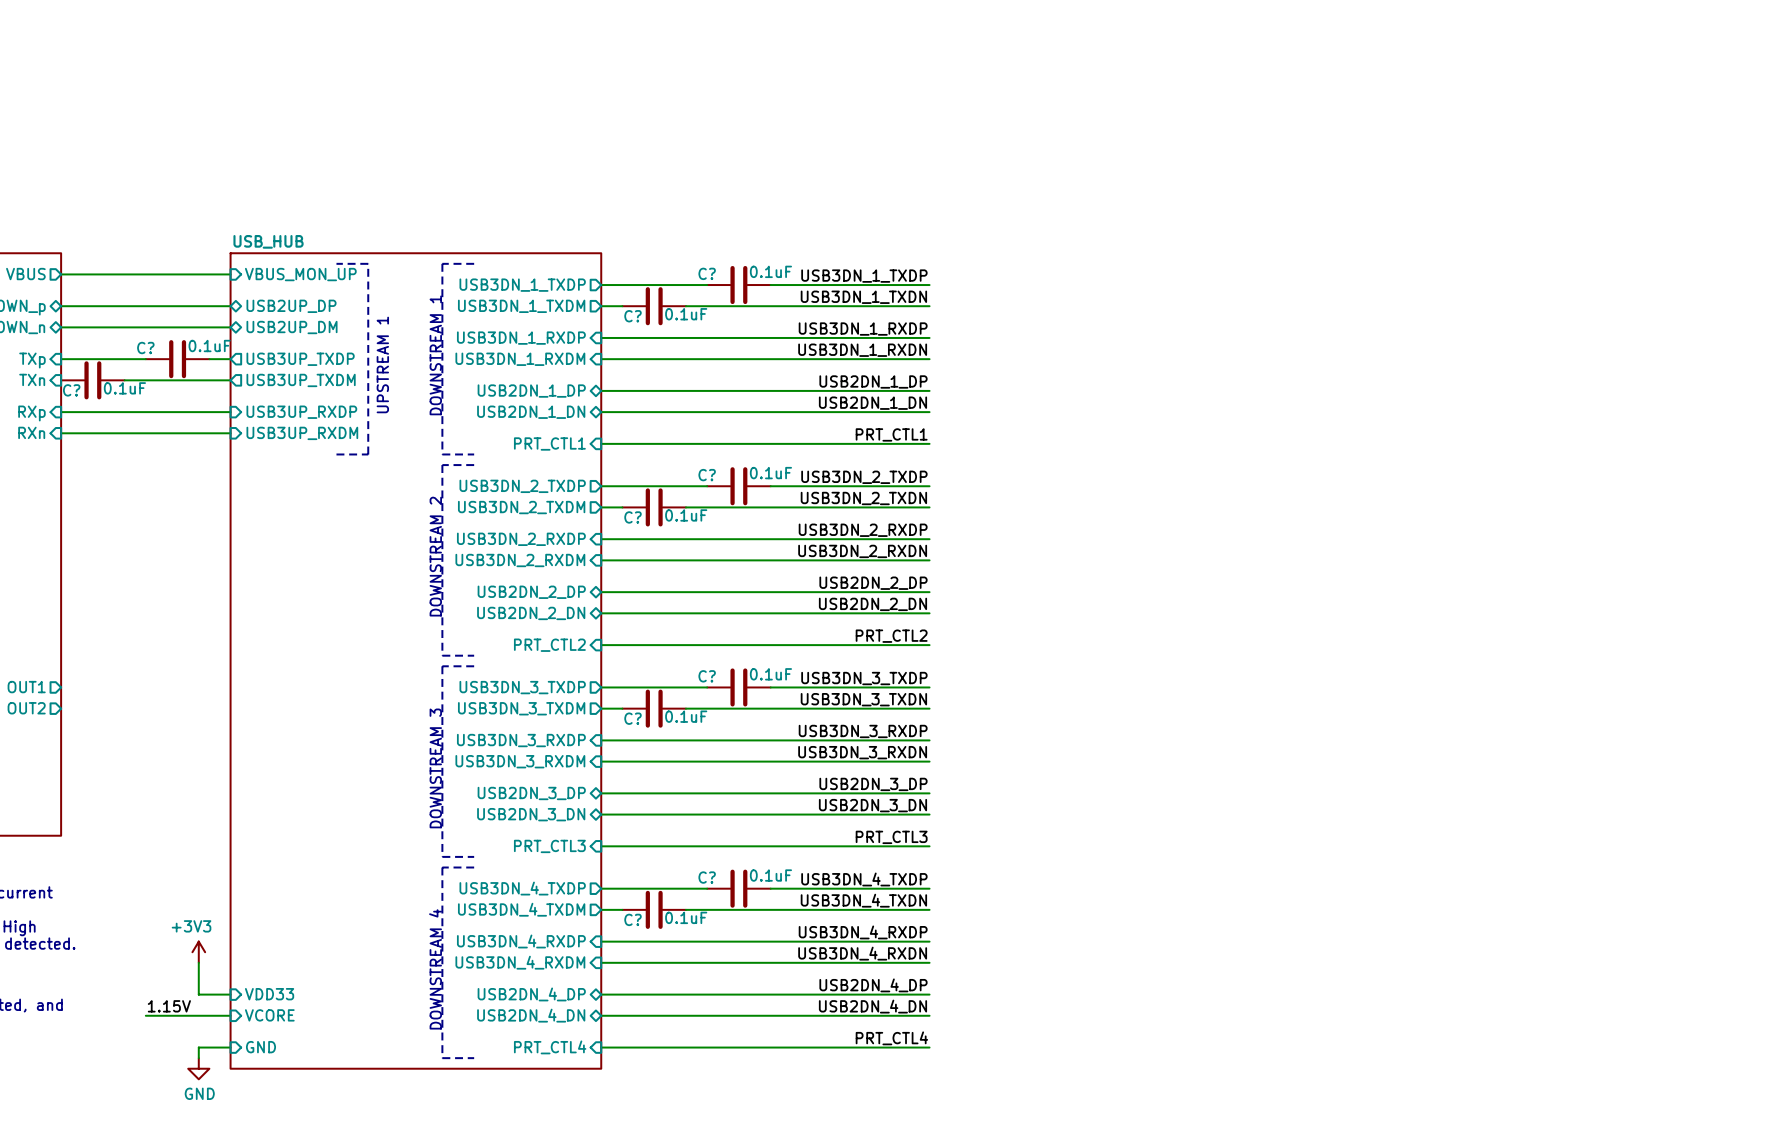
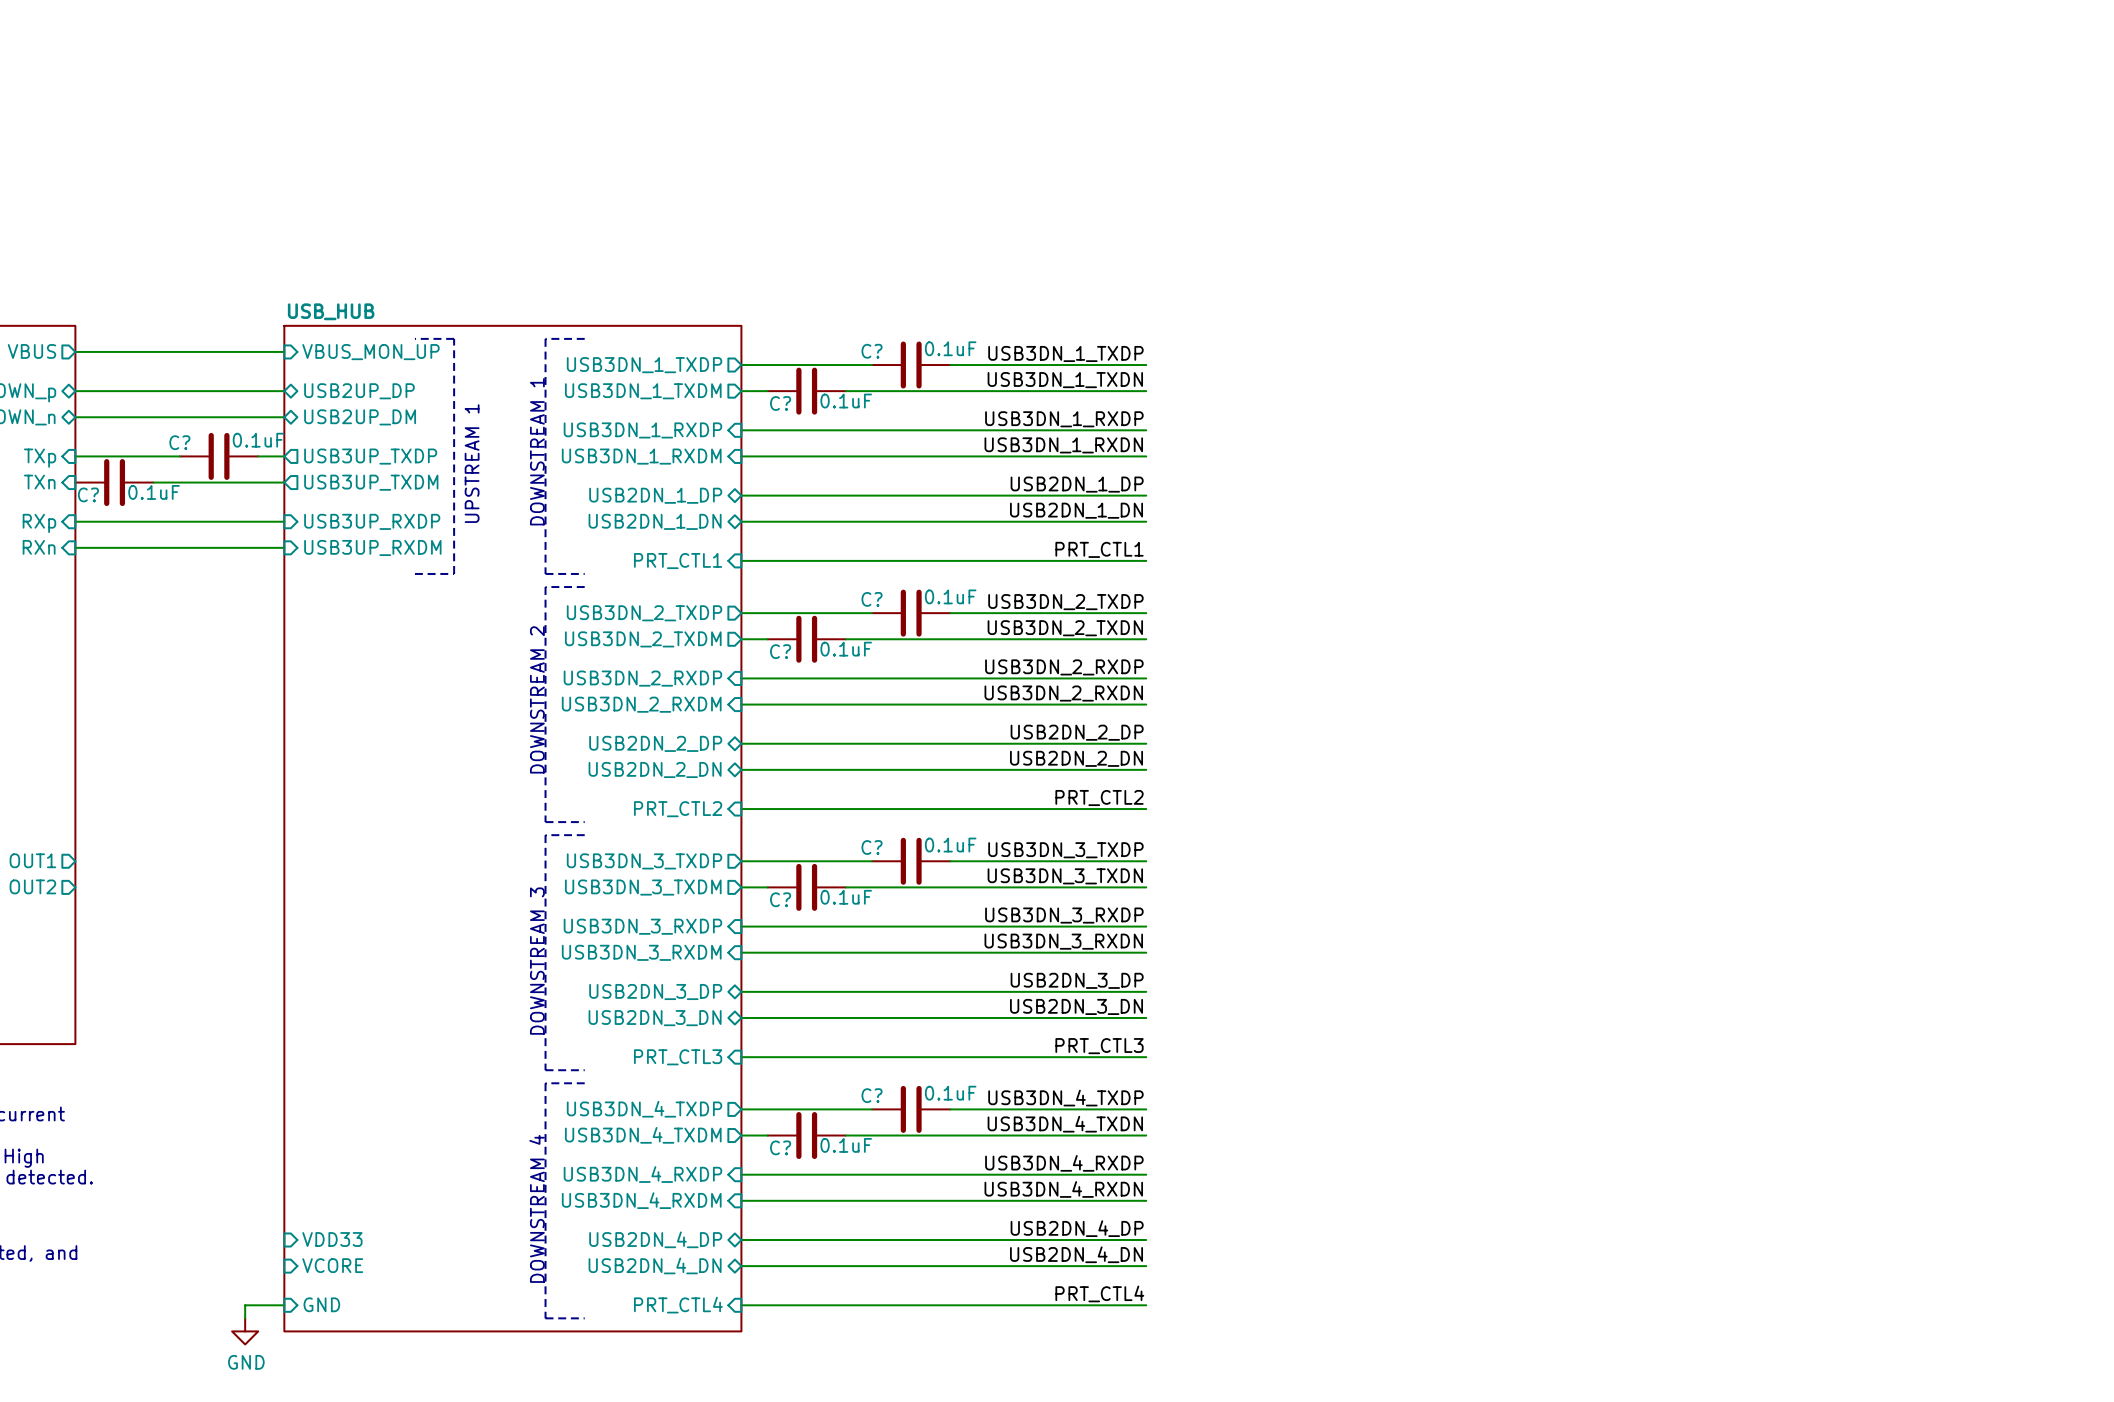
power symbol: +3V3 (198, 952) -> none
wire: (198, 962) (198, 994) (230, 994) -> none
label: 1.15V (169, 1006) -> none
wire: (145, 1015) (230, 1015) -> none

